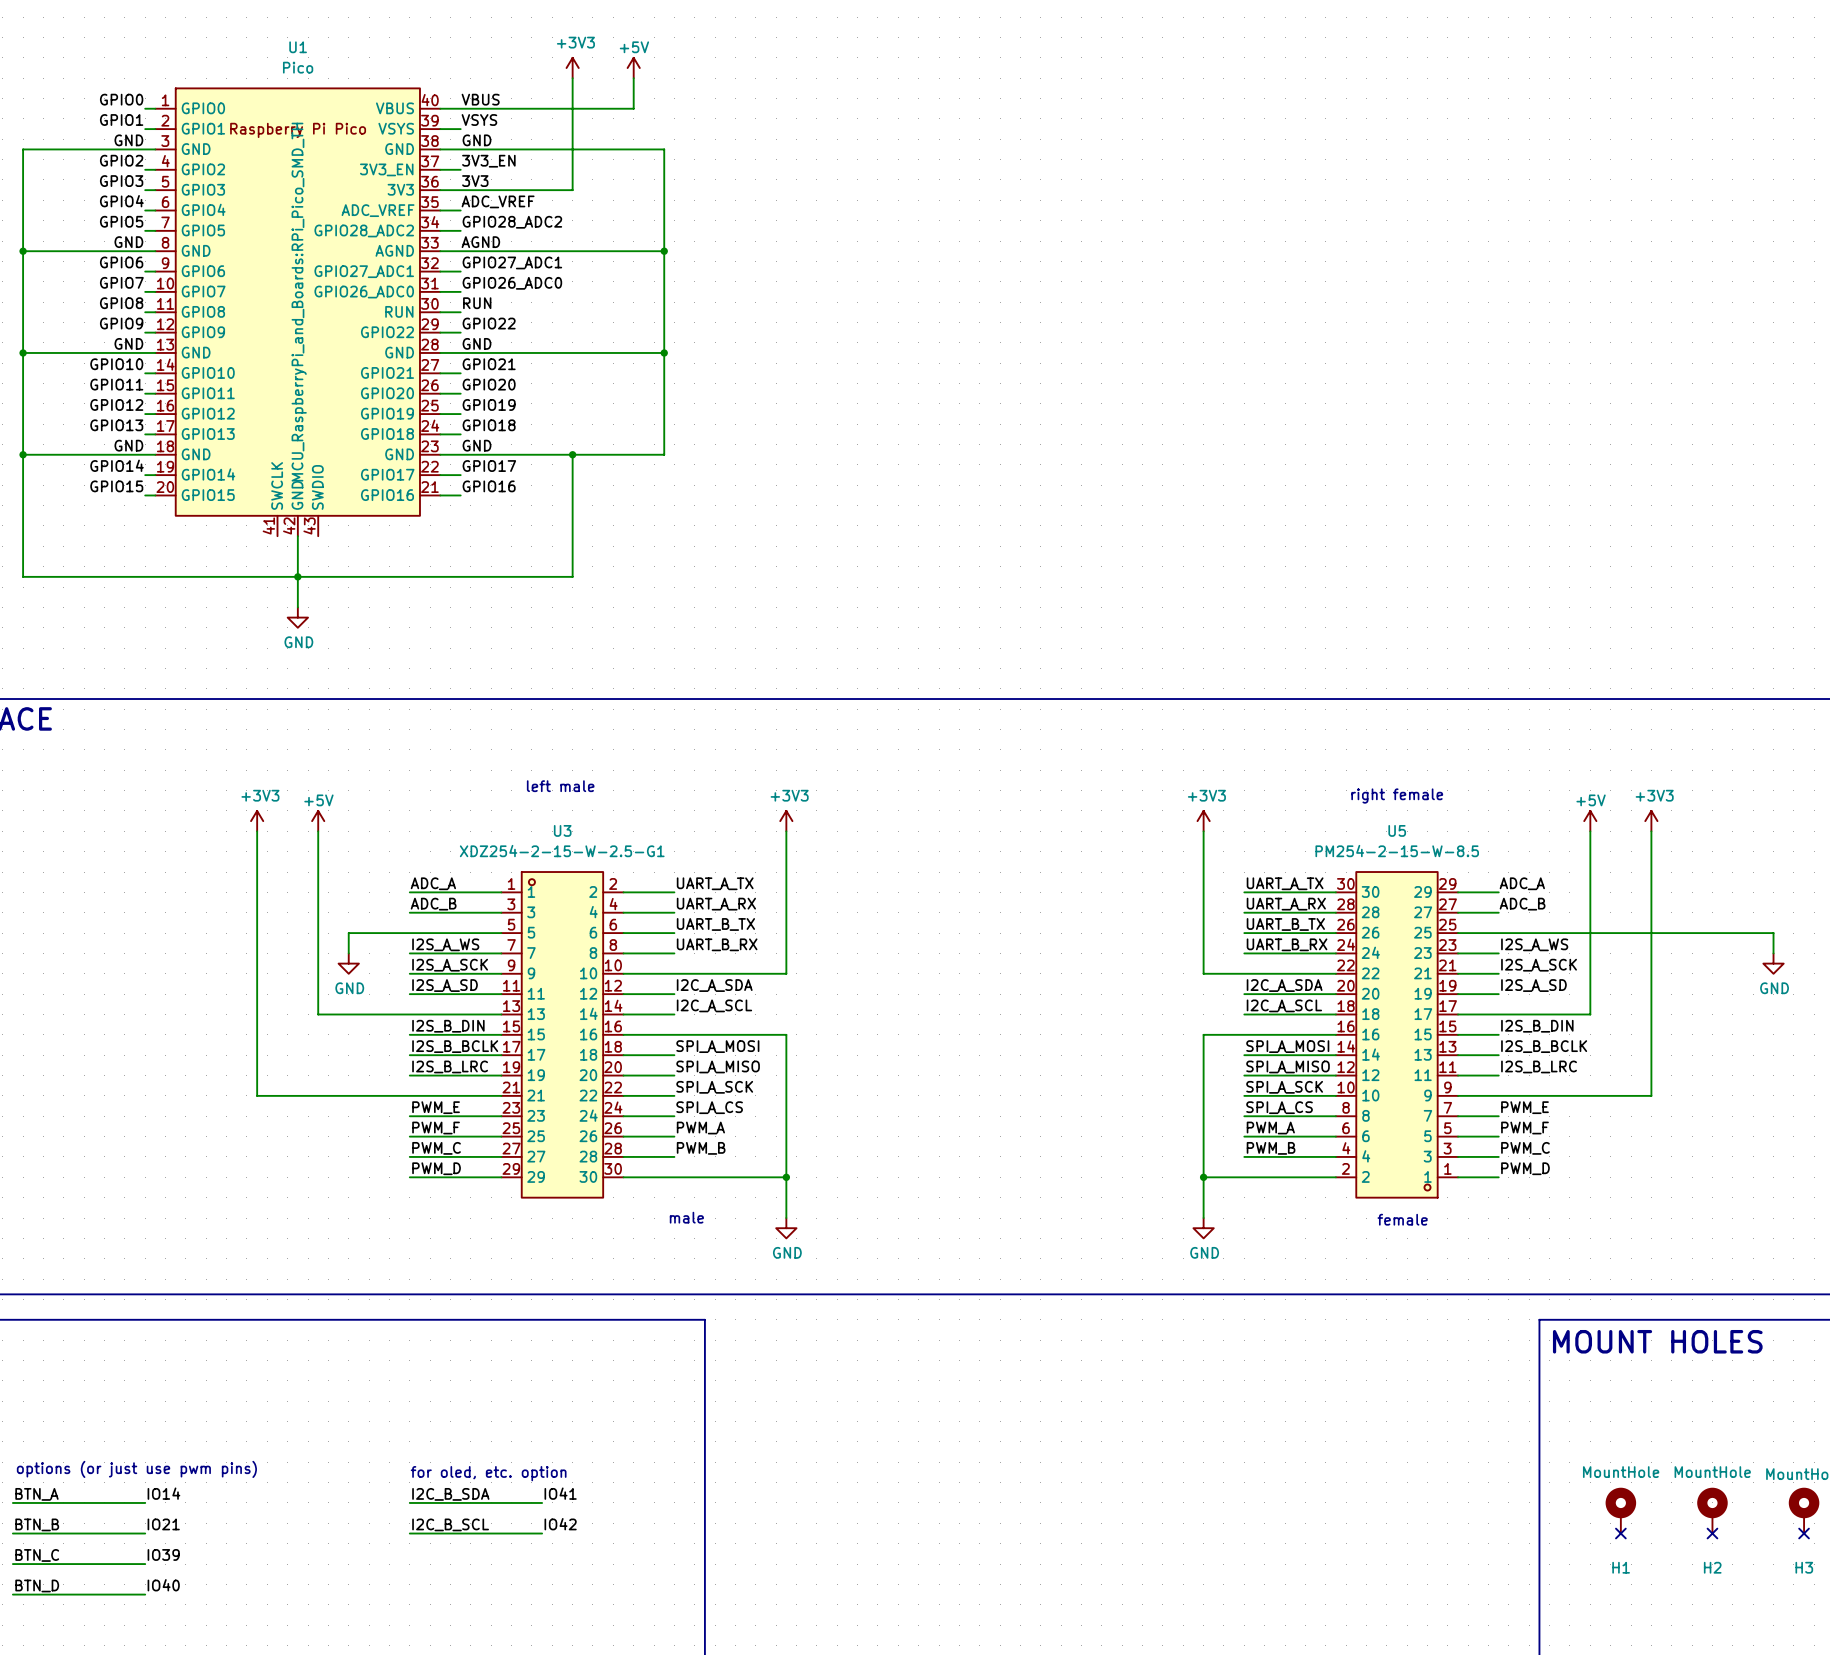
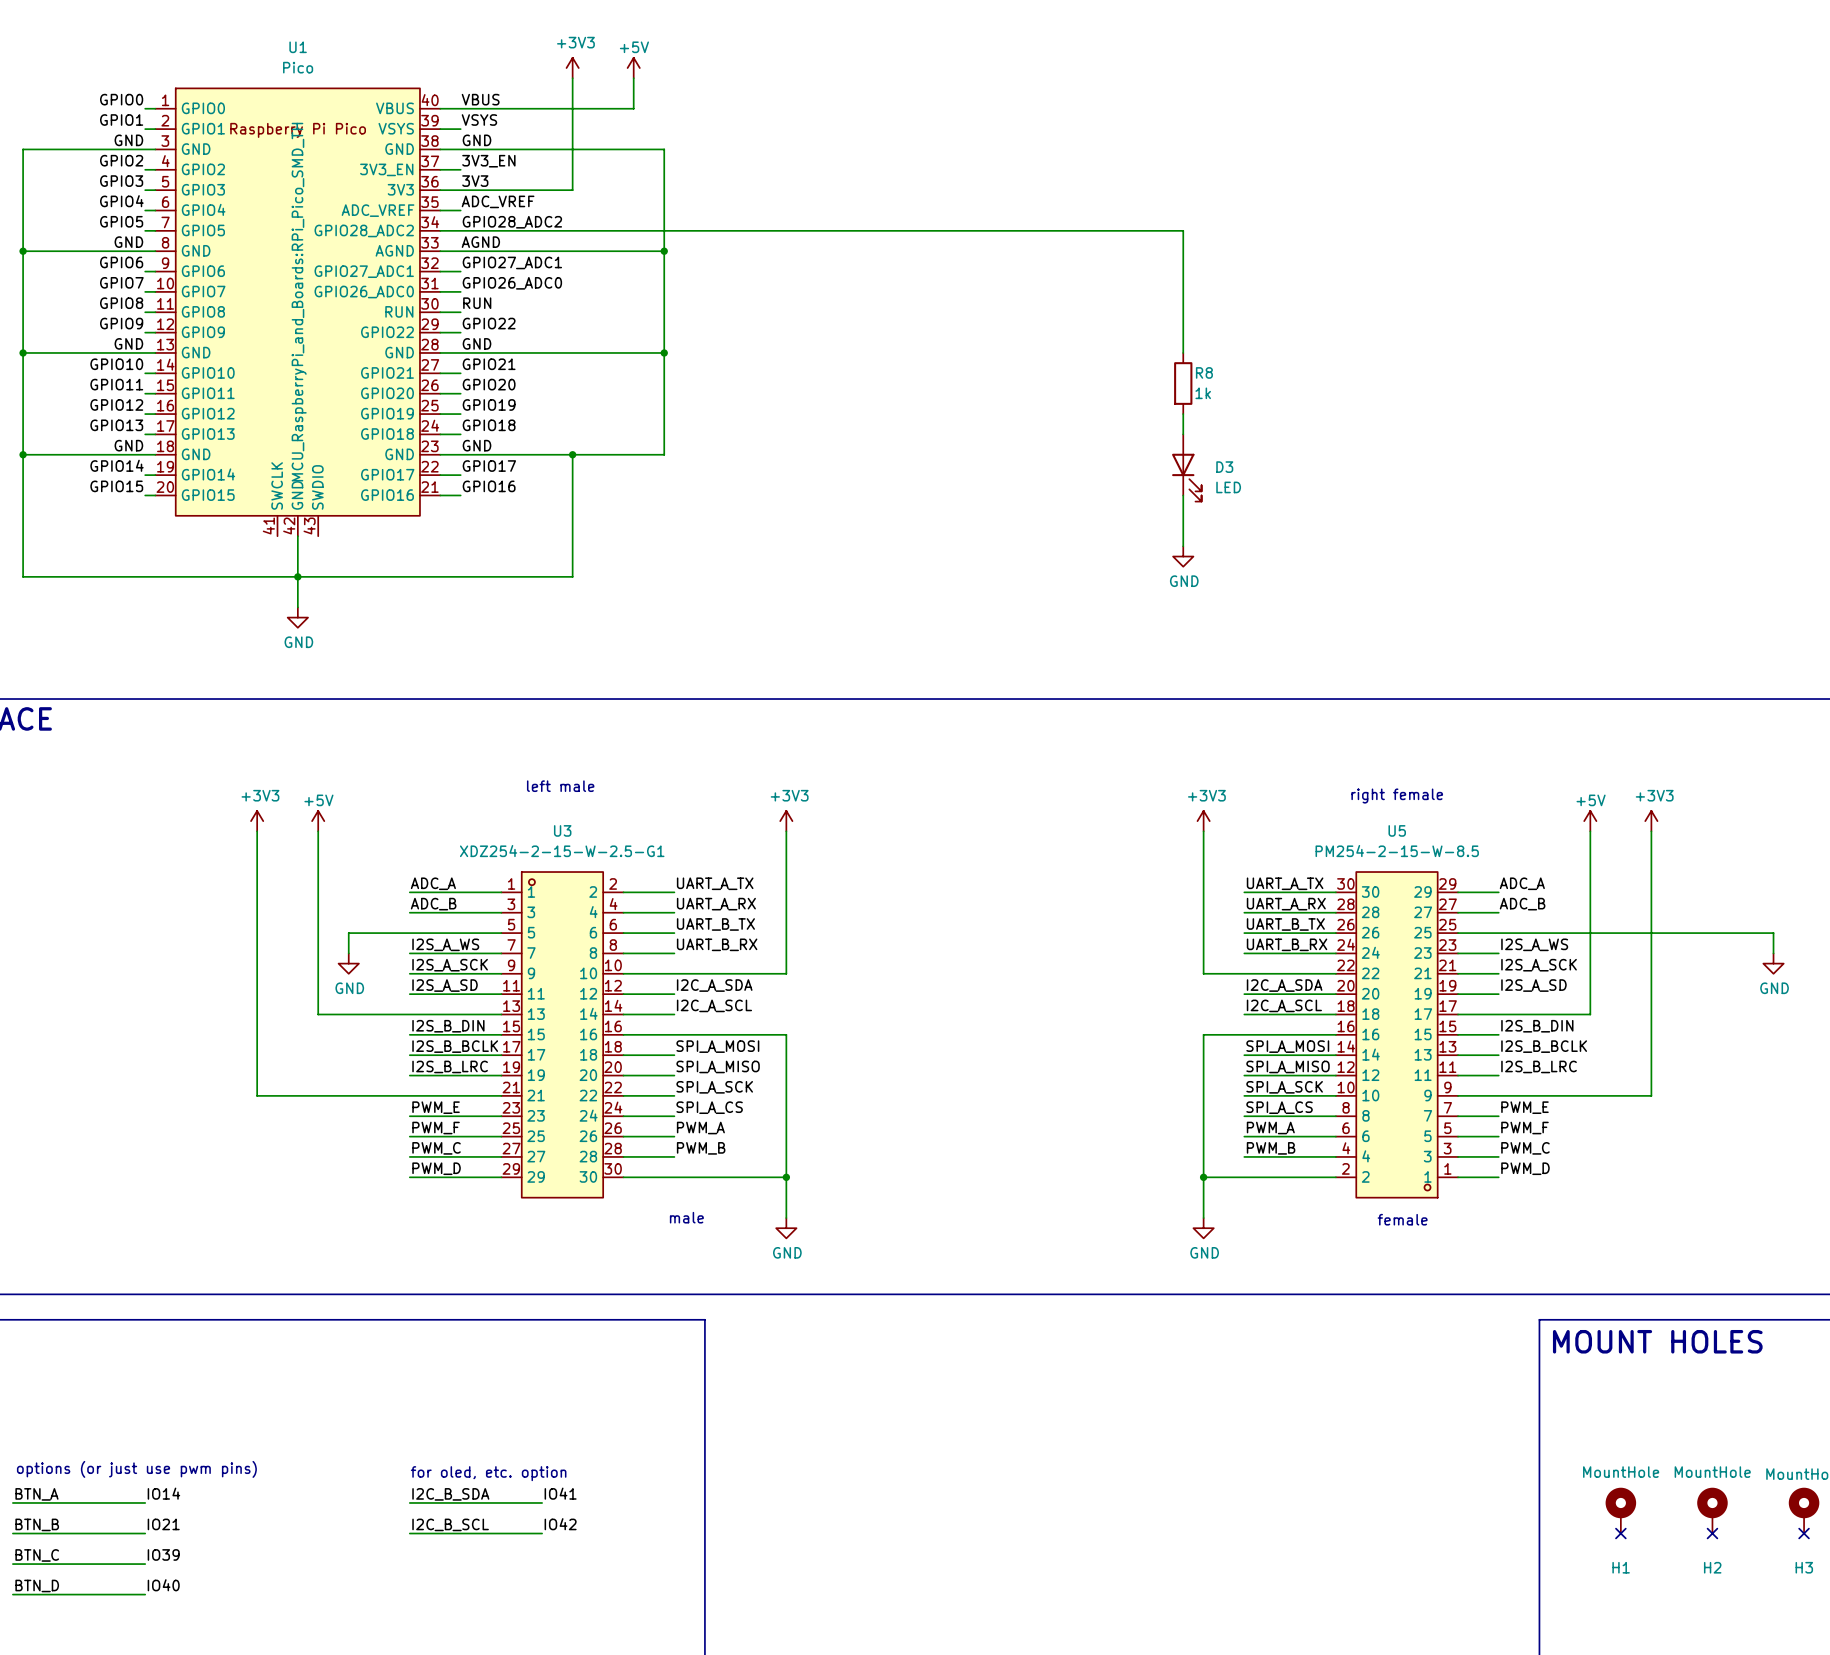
wire: none -> (460, 230) (1183, 230) (1183, 352)
R8: none -> 1k (1183, 383)
wire: none -> (1183, 414) (1183, 434)
D3: none -> LED (1186, 467)
wire: none -> (1183, 495) (1183, 546)
power symbol: none -> GND (1183, 556)

